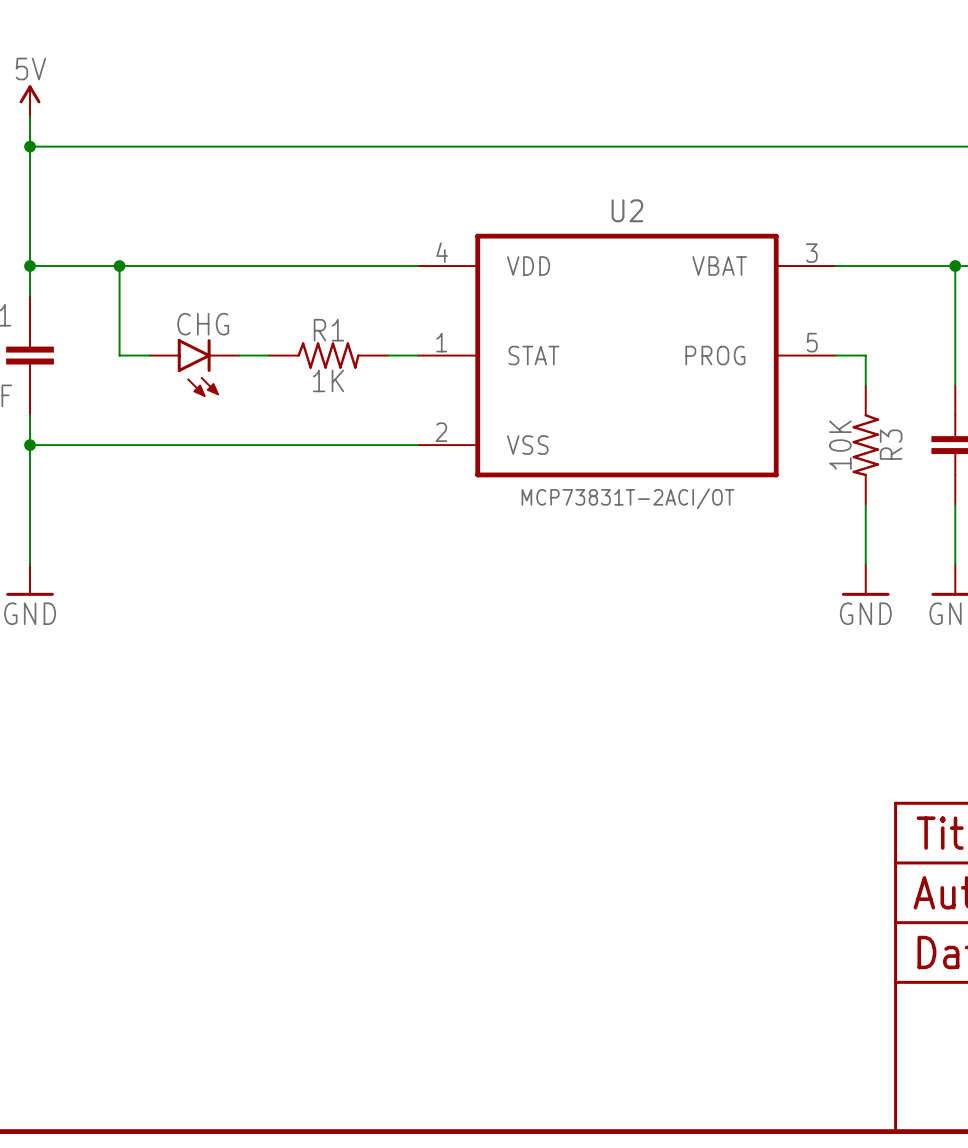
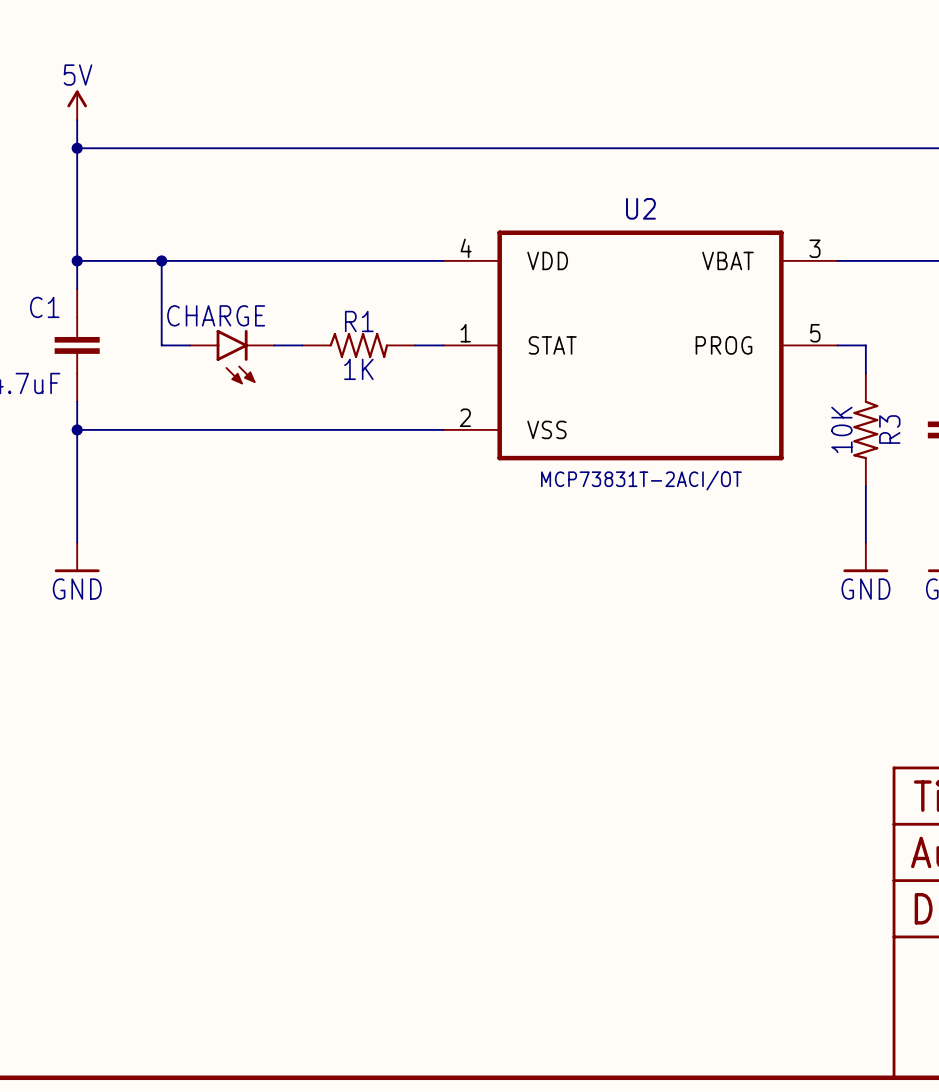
CHG name: CHG (203, 324) -> CHARGE (216, 315)

